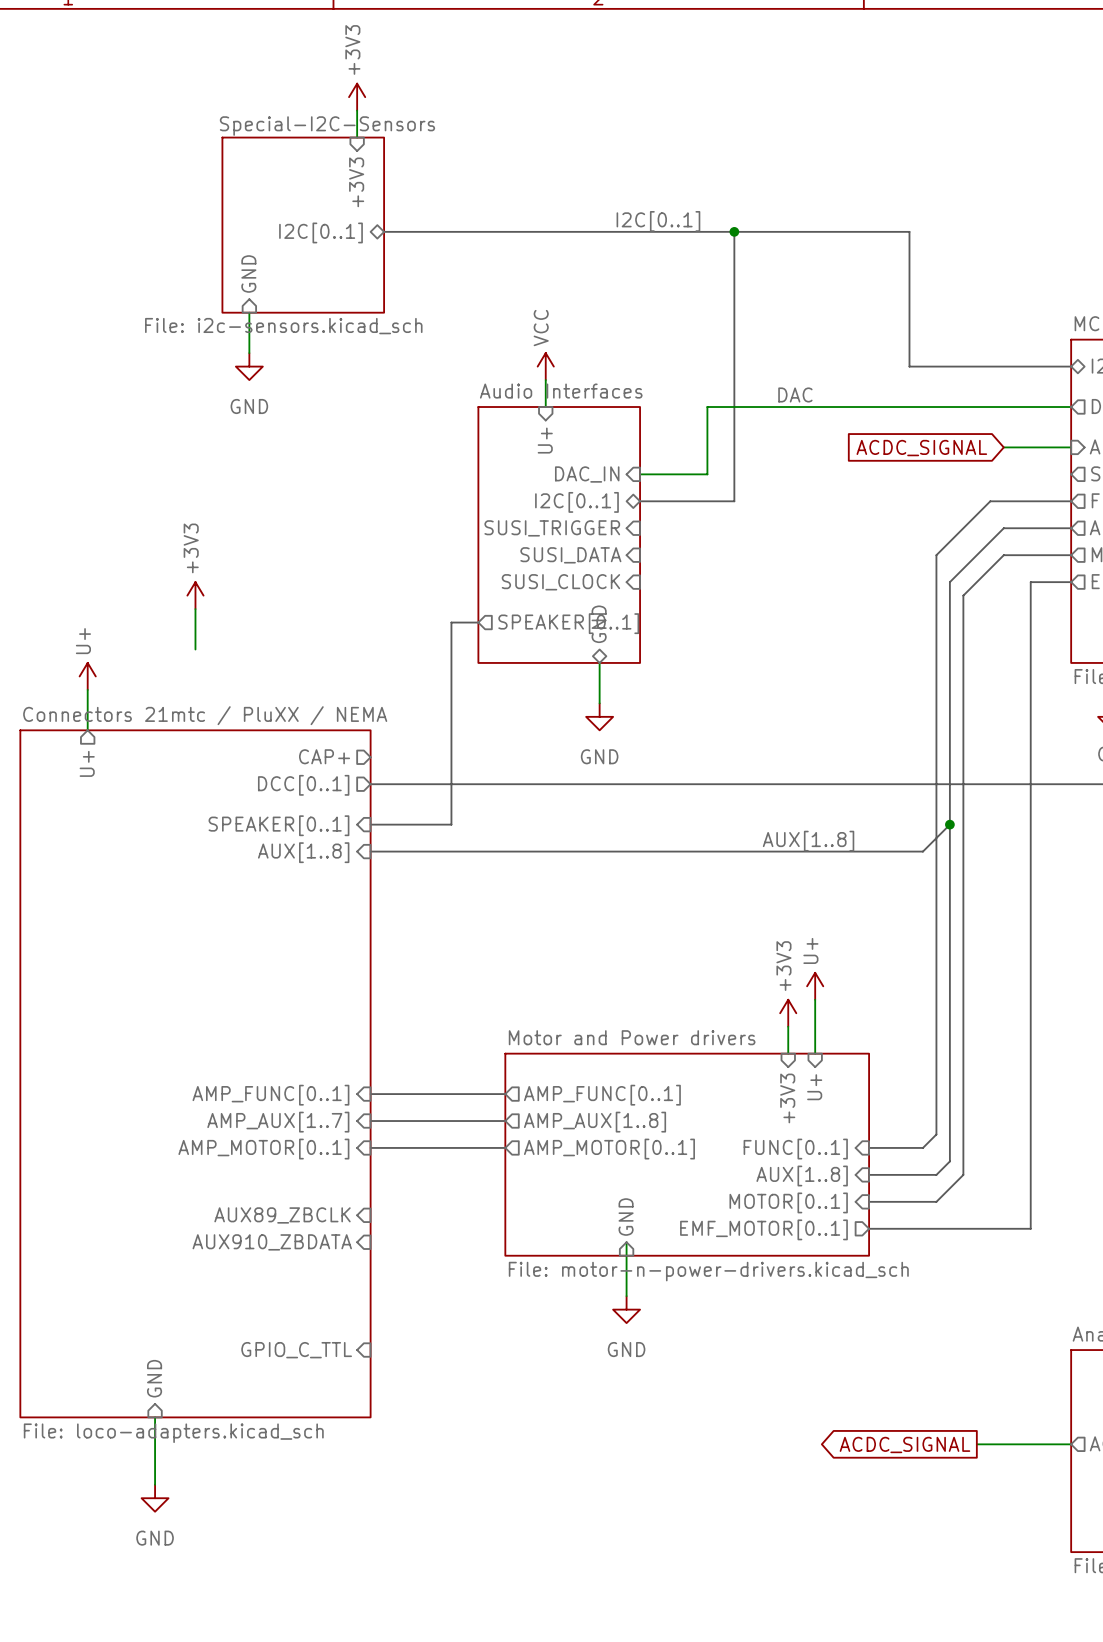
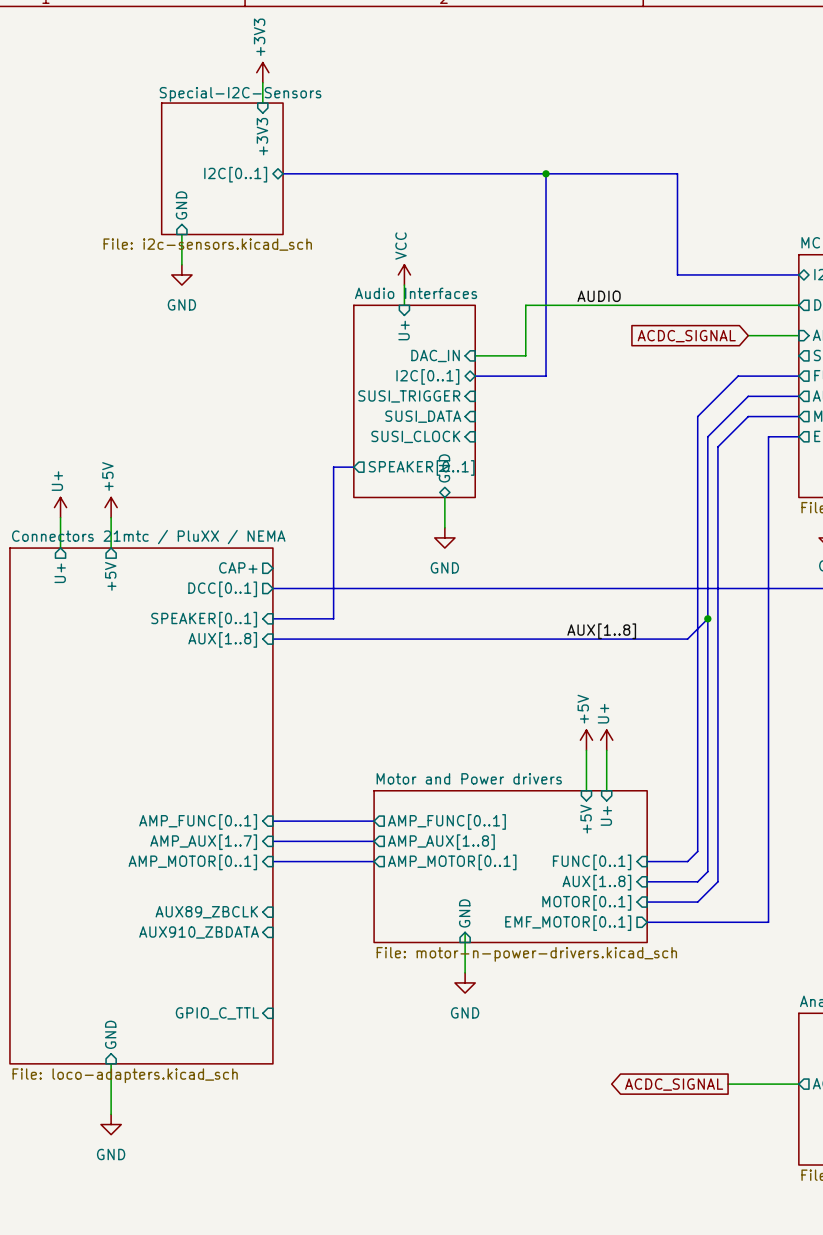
label: I2C[0..1] (658, 221) -> none
label: DAC (795, 394) -> AUDIO (599, 296)
power symbol: +3V3 (195, 595) -> none
wire: (195, 609) (195, 649) -> (111, 517) (111, 548)
power symbol: none -> +5V (111, 507)
sheet pin: none -> +5V (110, 576)
power symbol: none -> +5V (586, 740)
power symbol: +3V3 (788, 1013) -> none
sheet pin: +3V3 (787, 1098) -> +5V (586, 819)

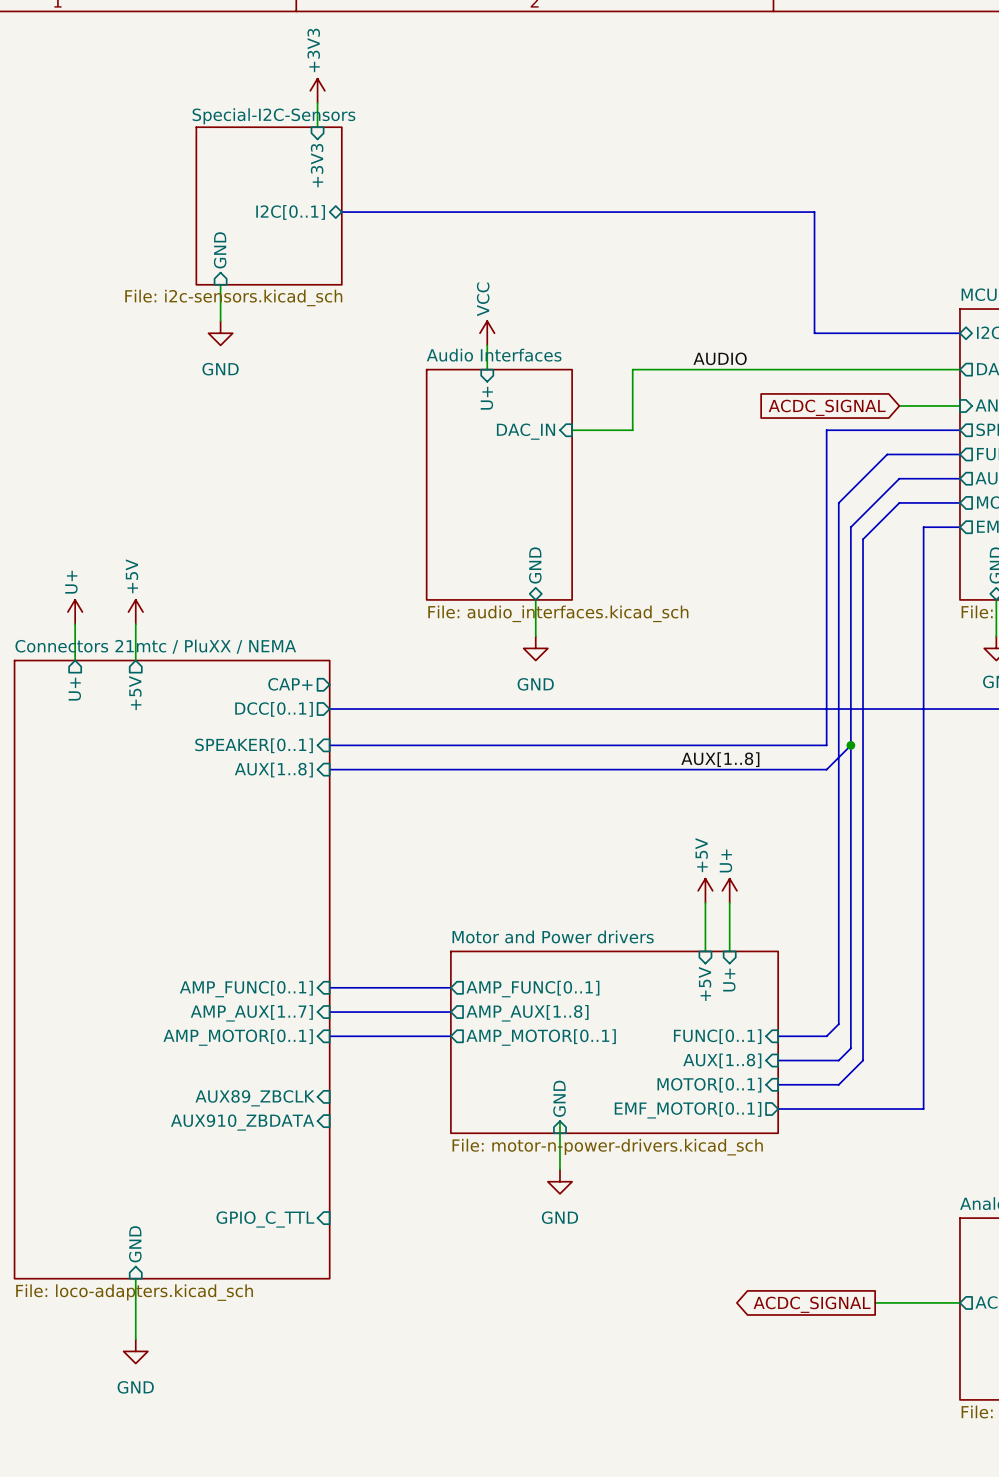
bus: (546, 173) (546, 376) (475, 376) -> none
junction: (546, 173) -> none
sheet pin: I2C[0..1] (427, 376) -> none
sheet pin: SUSI_TRIGGER (409, 396) -> none
sheet pin: SUSI_DATA (423, 416) -> none
sheet pin: SUSI_CLOCK (415, 436) -> none
bus: (353, 467) (333, 467) (333, 618) -> (959, 430) (826, 430) (826, 745) (402, 745)
sheet pin: SPEAKER[0..1] (421, 467) -> none
sheet Audio Interfaces value: none -> File: audio_interfaces.kicad_sch (558, 613)

